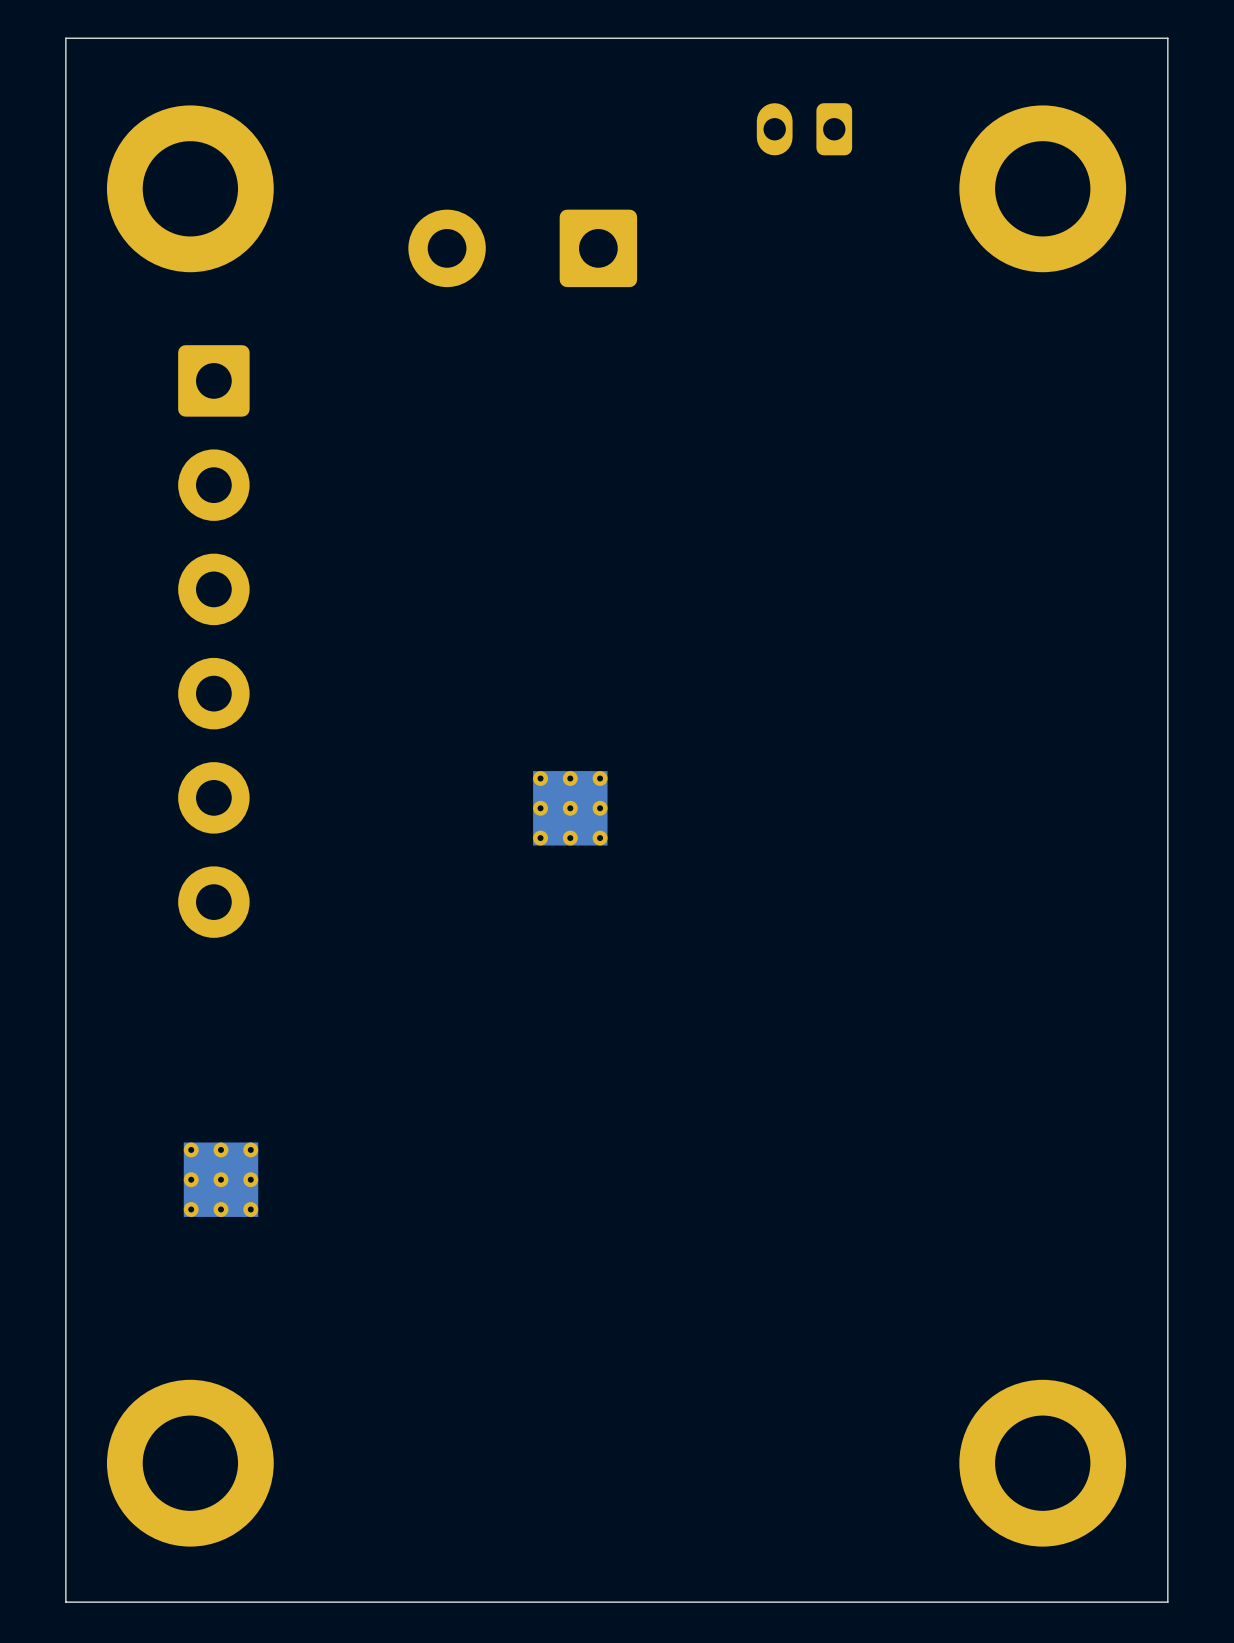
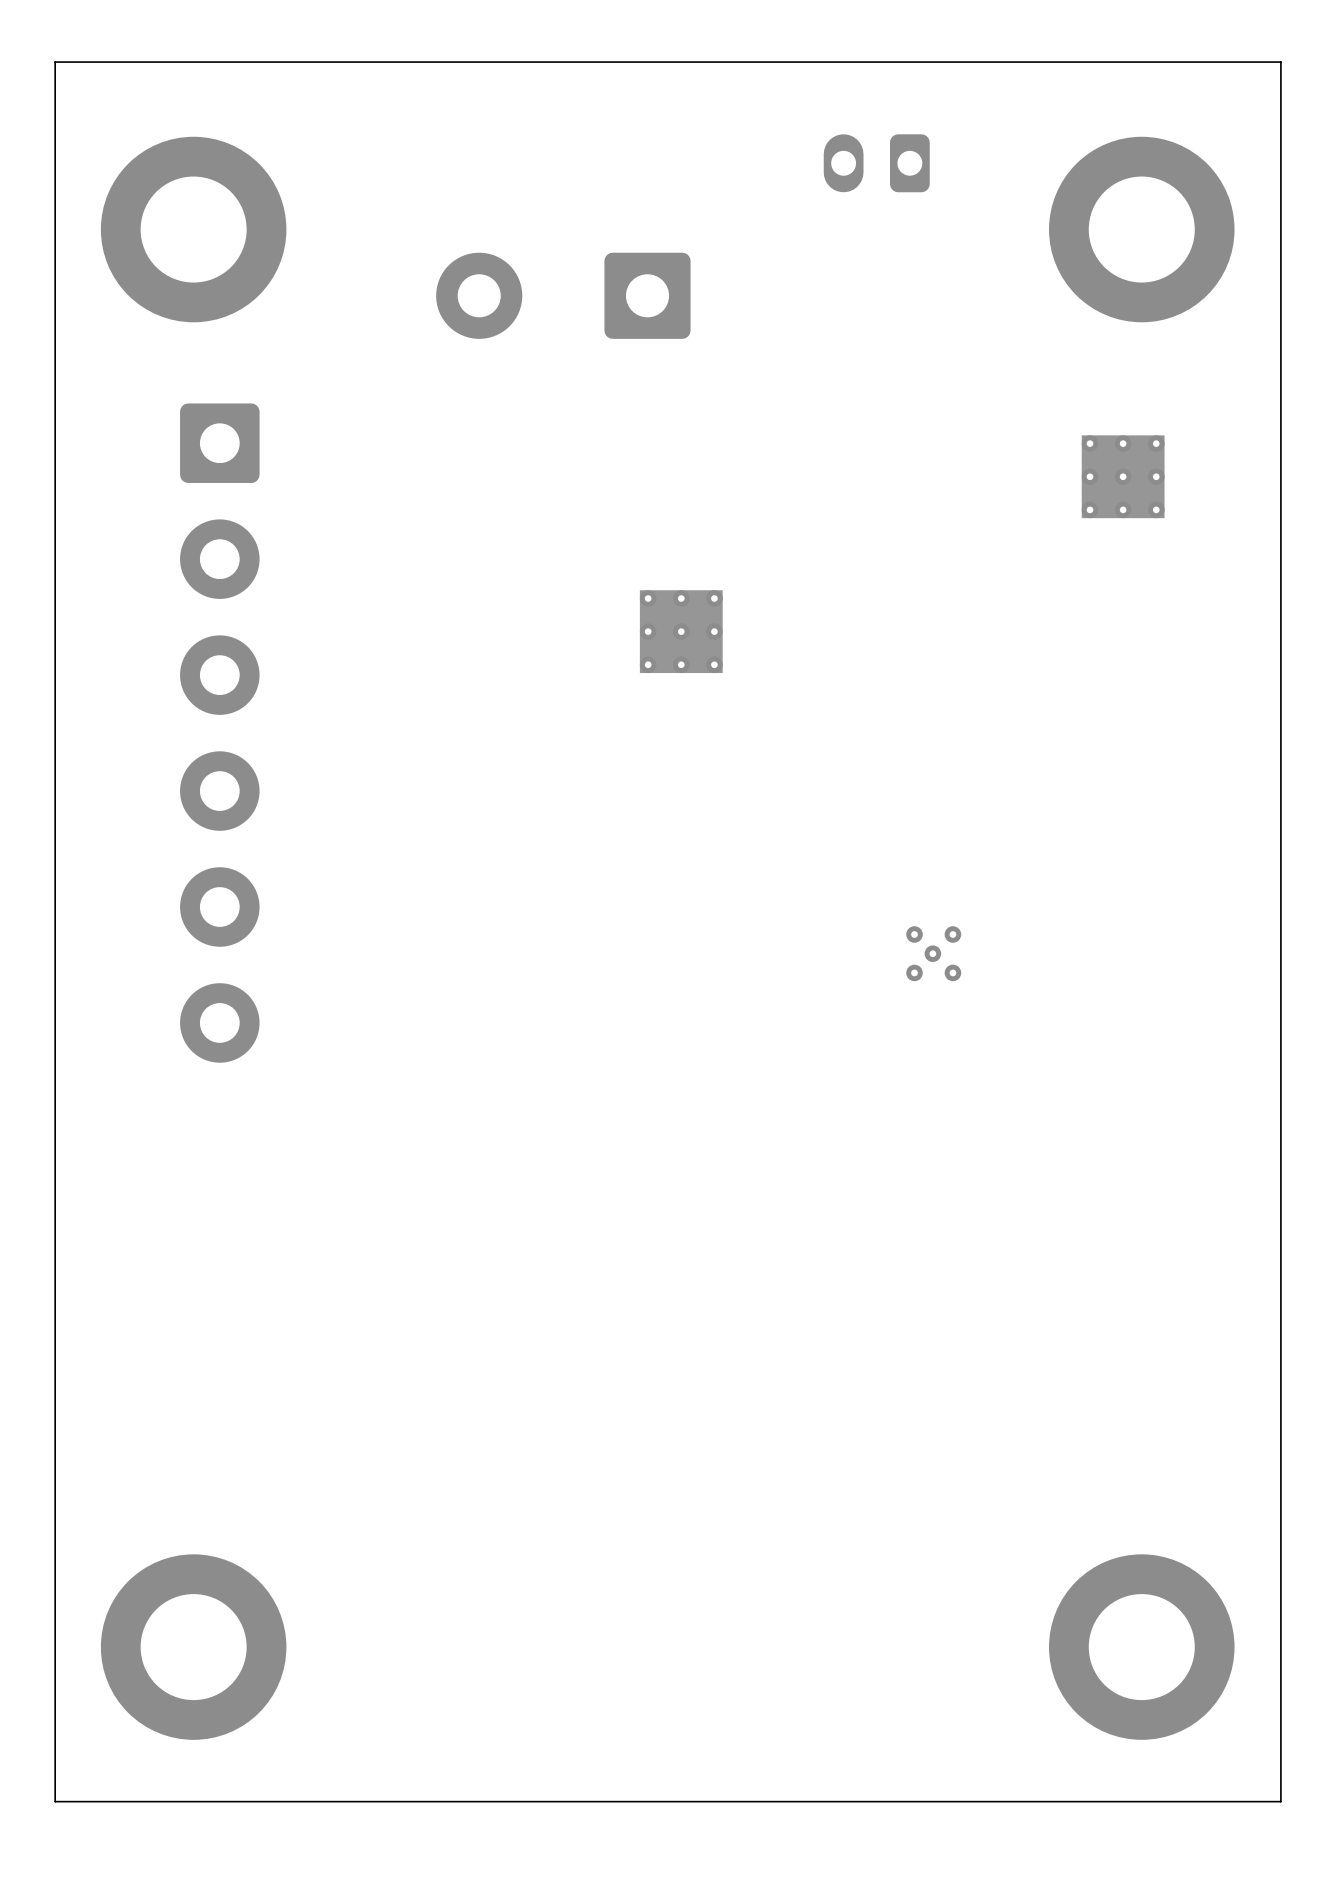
part: none -> (1123, 476)
part position: (570, 808) -> (681, 631)
part: none -> (933, 953)
part: (221, 1179) -> none

